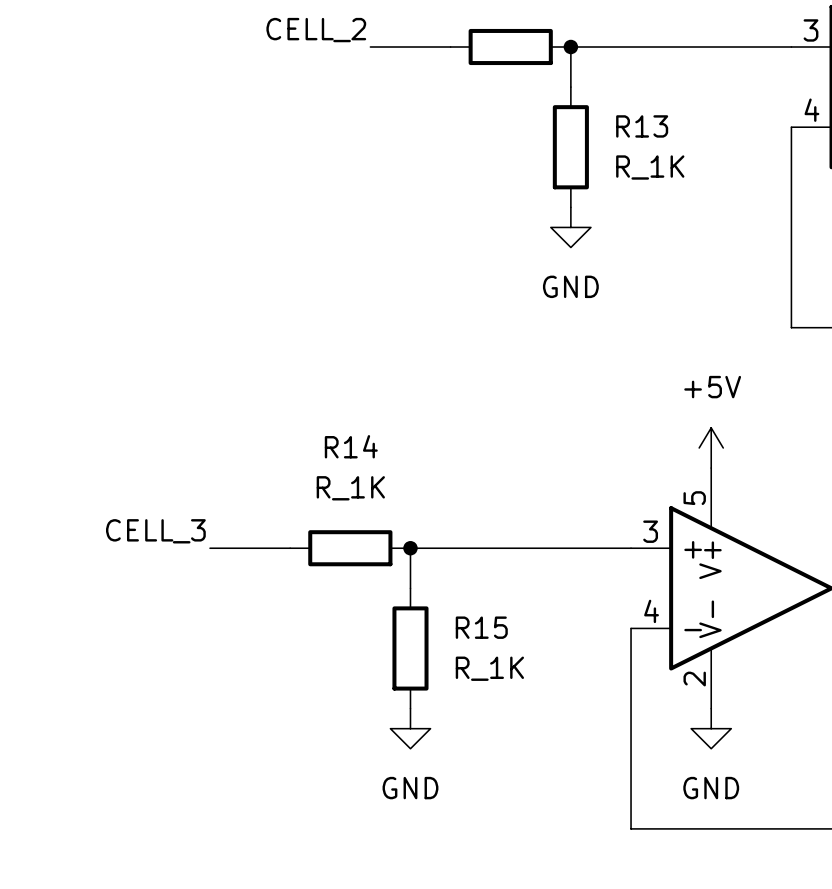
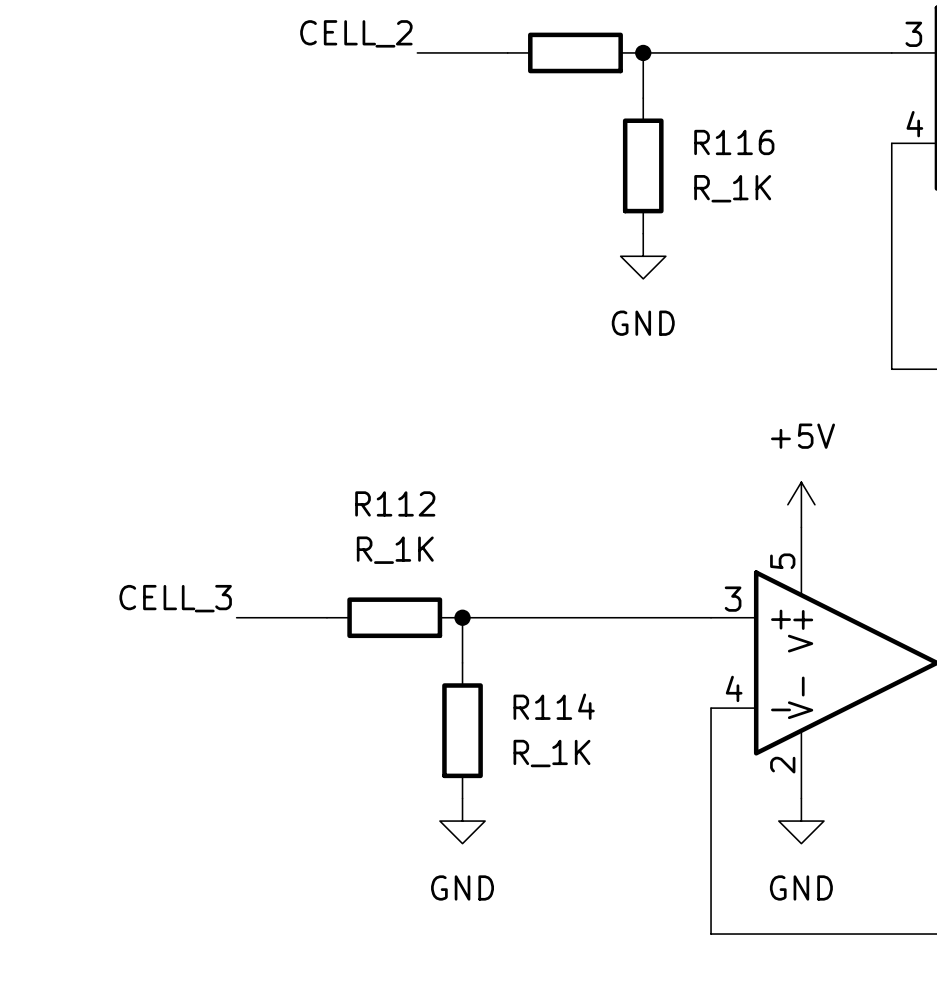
R13 name: R13 (642, 126) -> R116 (734, 142)
R14 name: R14 (351, 446) -> R112 (395, 503)
R15 name: R15 (481, 627) -> R114 (554, 706)

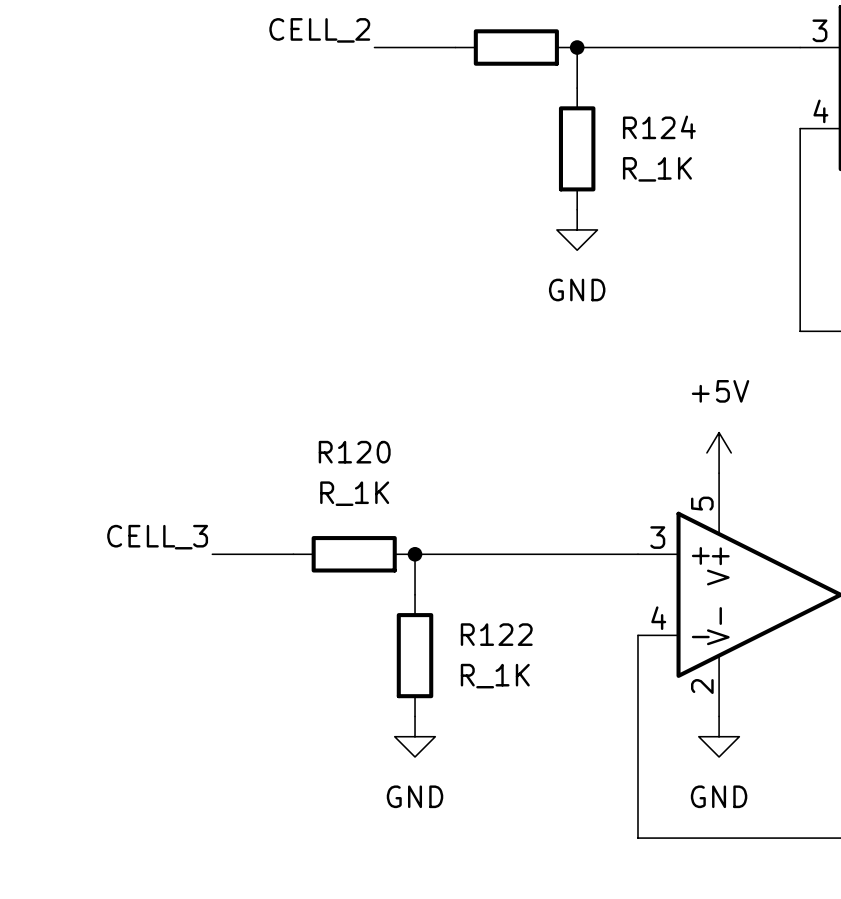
R116 name: R116 (734, 142) -> R124 (659, 127)
R112 name: R112 (395, 503) -> R120 (354, 452)
R114 name: R114 (554, 706) -> R122 (496, 634)

